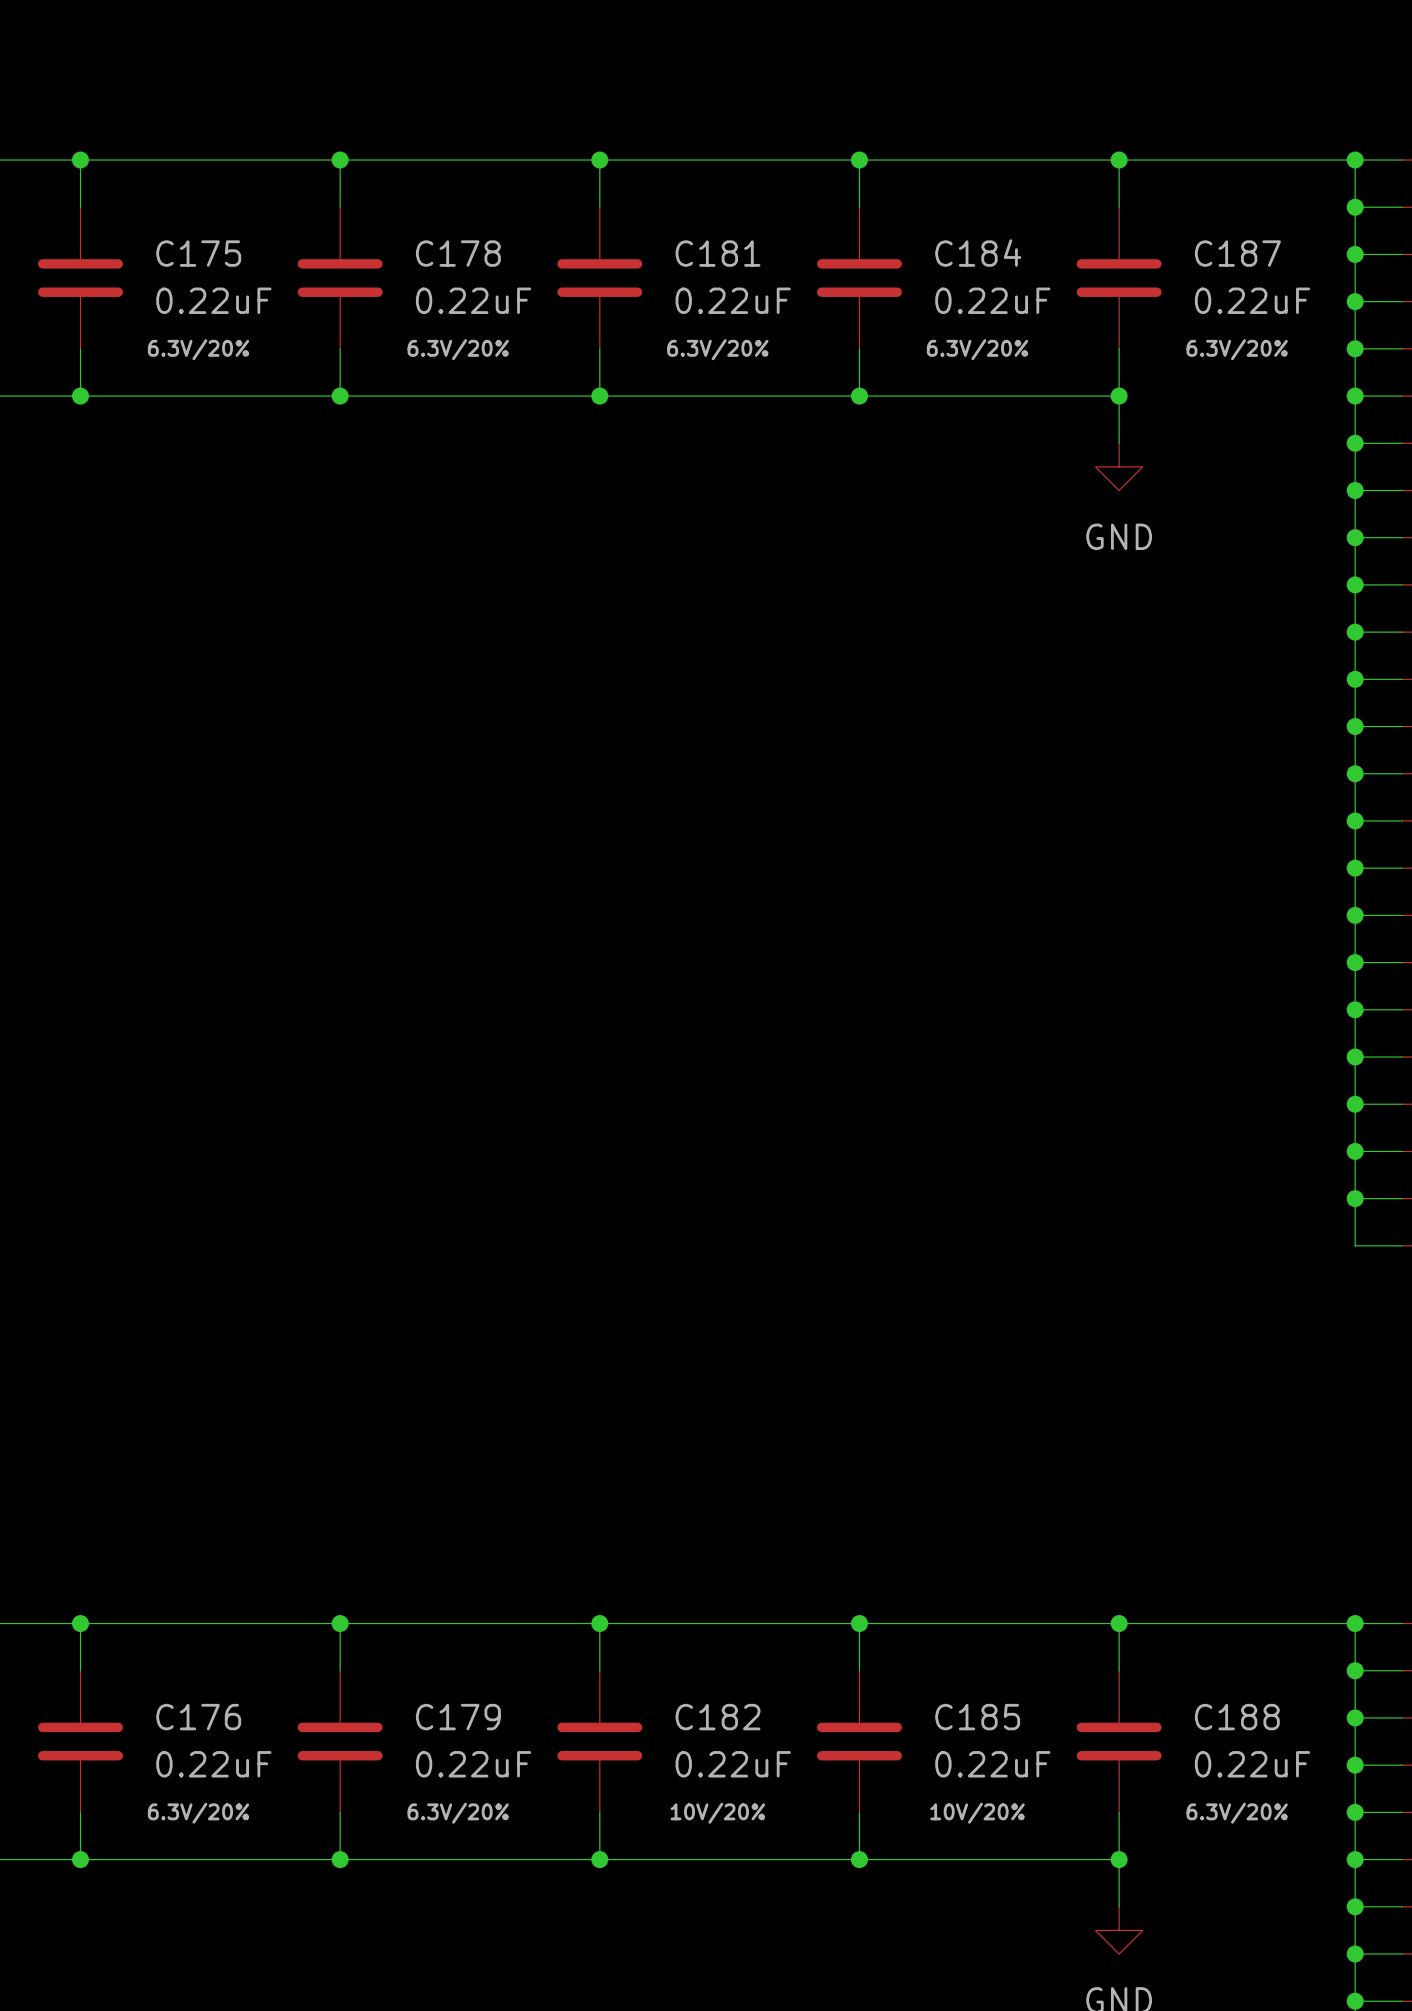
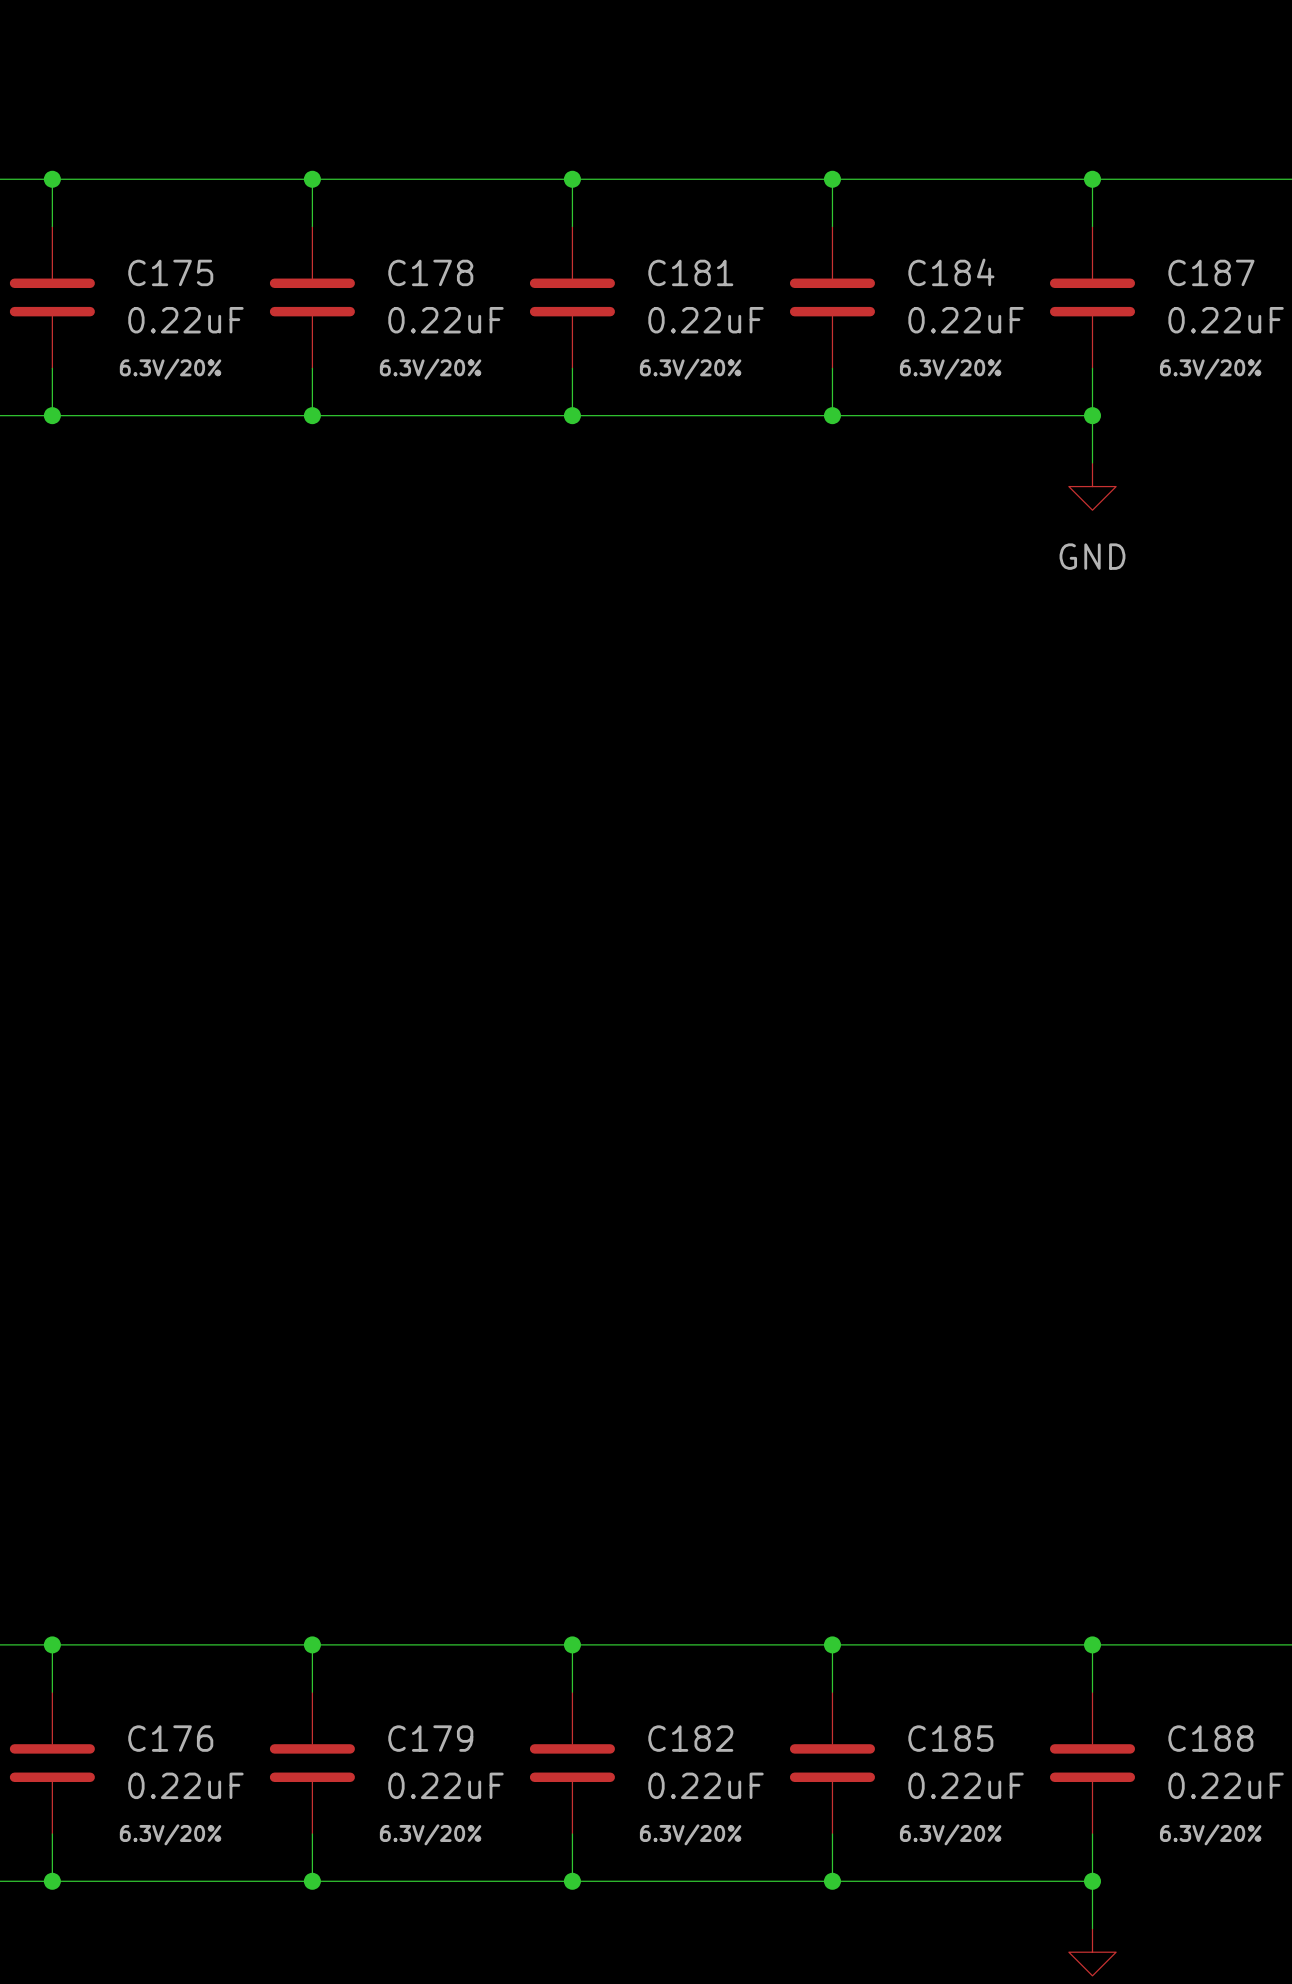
C182 text: 10V/20% (717, 1813) -> 6.3V/20% (690, 1834)
C185 text: 10V/20% (977, 1813) -> 6.3V/20% (950, 1834)

